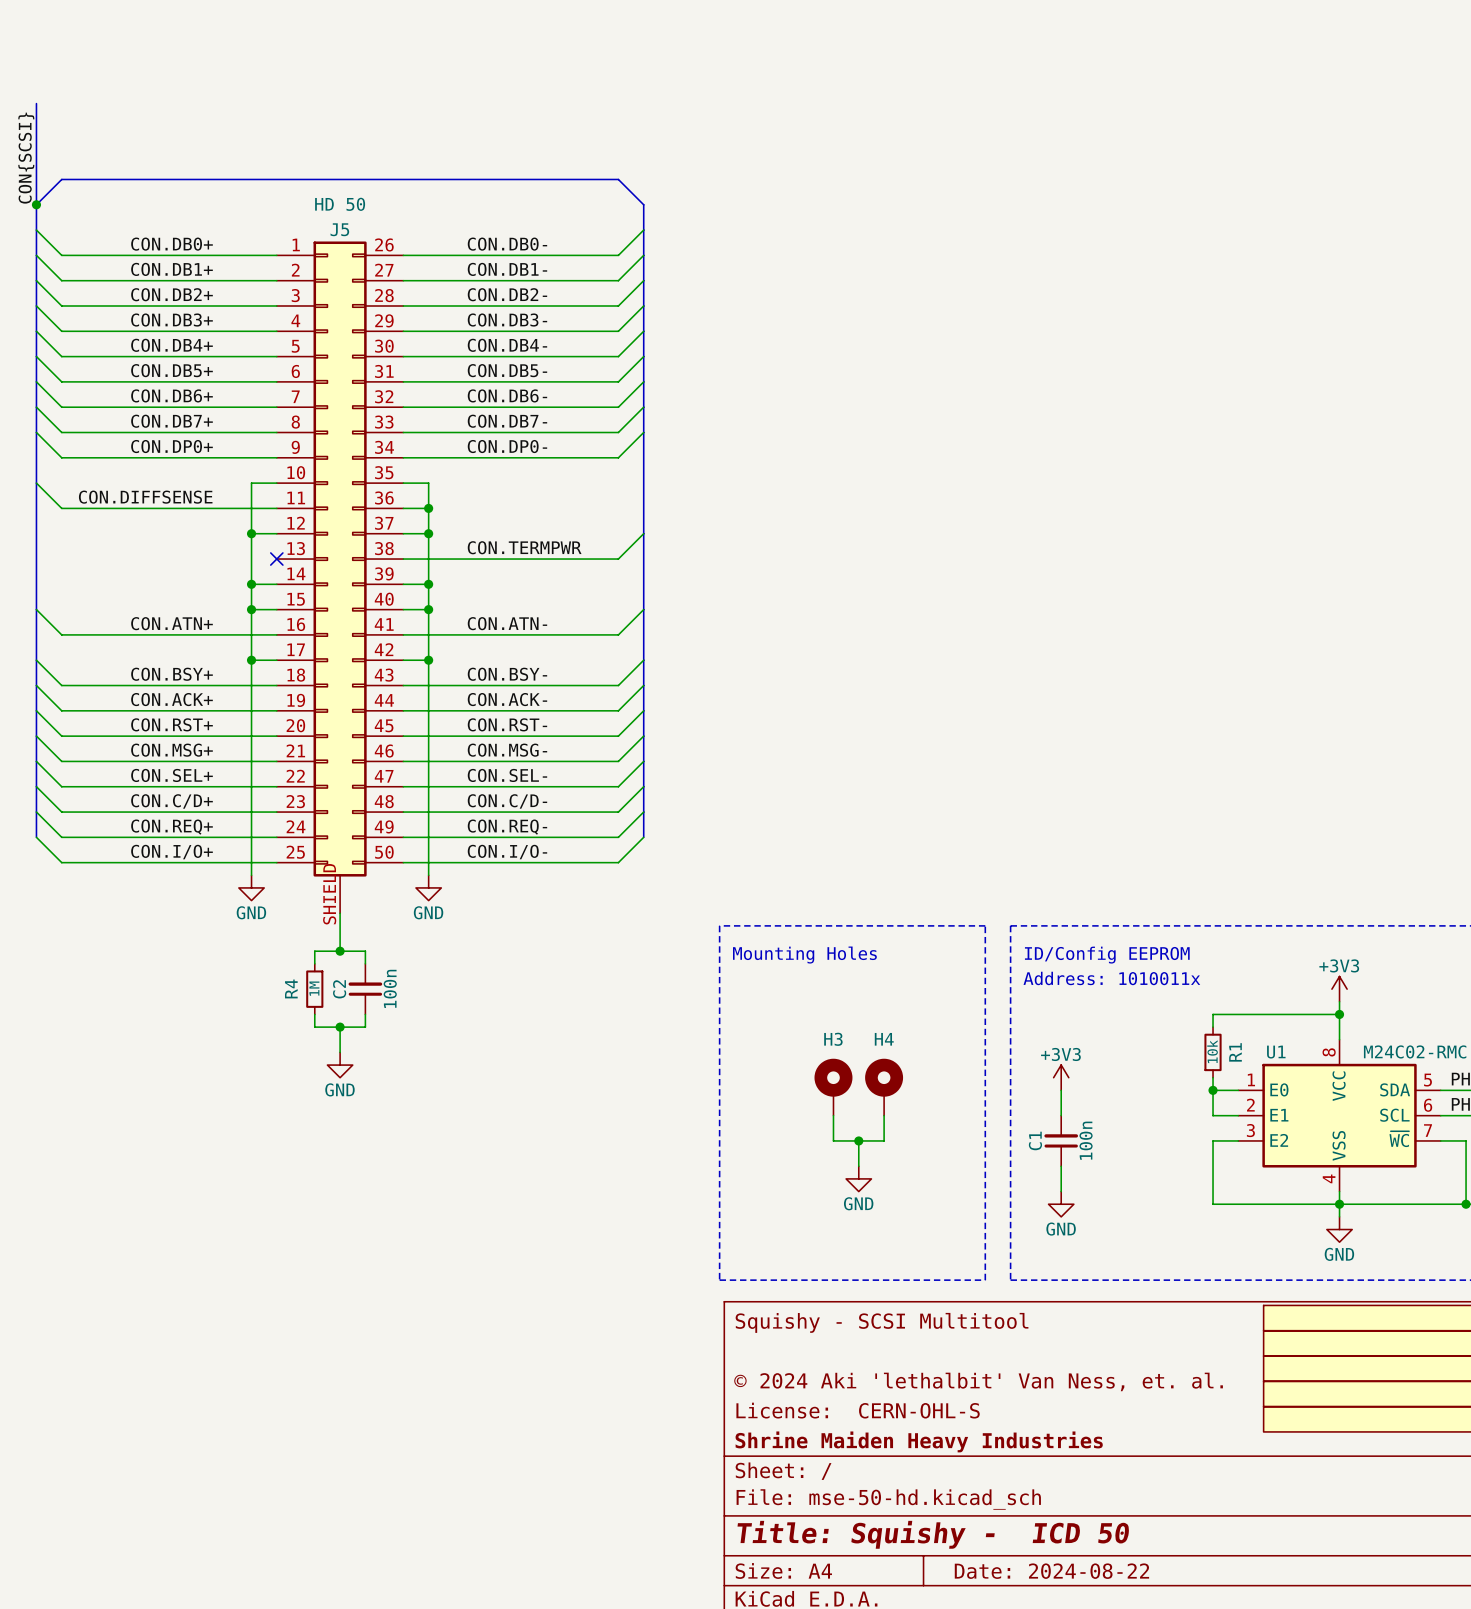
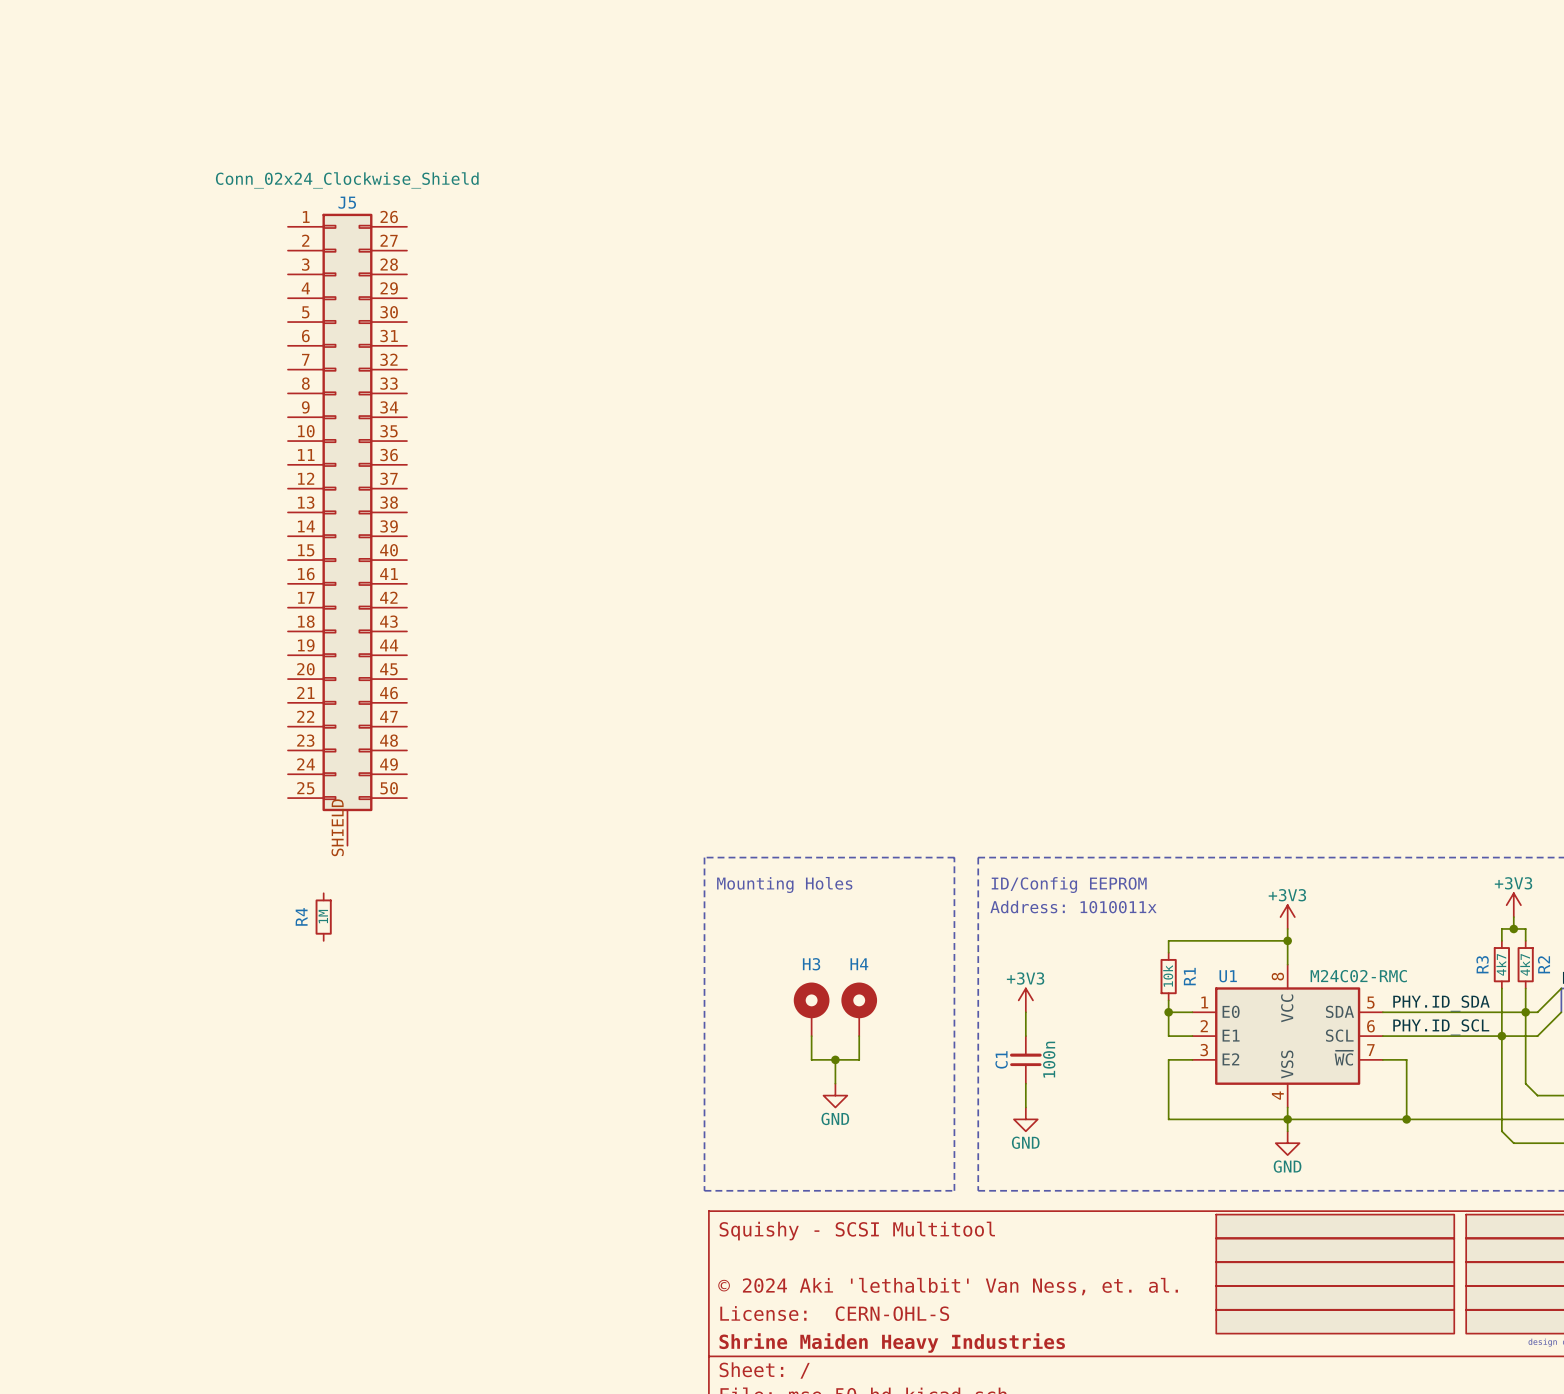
bus: (36, 103) (36, 837) -> none
label: CON{SCSI} (26, 158) -> none
bus: (36, 204) (61, 179) (618, 179) (643, 204) (643, 837) -> none
junction: (36, 204) -> none
J5 value: HD 50 (340, 204) -> Conn_02x24_Clockwise_Shield (347, 180)
wire: (36, 230) (61, 255) (276, 255) -> none
wire: (643, 230) (618, 255) (403, 255) -> none
label: CON.DB0+ (172, 244) -> none
label: CON.DB0- (507, 244) -> none
wire: (36, 255) (61, 280) (276, 280) -> none
wire: (643, 255) (618, 280) (403, 280) -> none
label: CON.DB1+ (172, 269) -> none
label: CON.DB1- (507, 269) -> none
wire: (36, 280) (61, 305) (276, 305) -> none
wire: (643, 280) (618, 305) (403, 305) -> none
label: CON.DB2+ (172, 294) -> none
label: CON.DB2- (507, 294) -> none
wire: (36, 305) (61, 331) (276, 331) -> none
wire: (643, 305) (618, 331) (403, 331) -> none
label: CON.DB3+ (172, 320) -> none
label: CON.DB3- (507, 320) -> none
wire: (36, 331) (61, 356) (276, 356) -> none
wire: (643, 331) (618, 356) (403, 356) -> none
label: CON.DB4+ (172, 345) -> none
label: CON.DB4- (507, 345) -> none
wire: (36, 356) (61, 381) (276, 381) -> none
wire: (643, 356) (618, 381) (403, 381) -> none
label: CON.DB5+ (172, 370) -> none
label: CON.DB5- (507, 370) -> none
wire: (36, 381) (61, 407) (276, 407) -> none
wire: (643, 381) (618, 407) (403, 407) -> none
label: CON.DB6+ (172, 395) -> none
label: CON.DB6- (507, 395) -> none
wire: (36, 407) (61, 432) (276, 432) -> none
wire: (643, 407) (618, 432) (403, 432) -> none
label: CON.DB7+ (172, 421) -> none
label: CON.DB7- (507, 421) -> none
wire: (36, 432) (61, 457) (276, 457) -> none
wire: (643, 432) (618, 457) (403, 457) -> none
label: CON.DP0+ (172, 446) -> none
label: CON.DP0- (507, 446) -> none
wire: (36, 483) (61, 508) (276, 508) -> none
wire: (276, 483) (251, 483) (251, 875) -> none
wire: (403, 483) (428, 483) (428, 875) -> none
label: CON.DIFFSENSE (145, 497) -> none
wire: (403, 508) (428, 508) -> none
junction: (428, 508) -> none
wire: (251, 533) (276, 533) -> none
junction: (251, 533) -> none
wire: (403, 533) (428, 533) -> none
junction: (428, 533) -> none
wire: (643, 533) (618, 559) (403, 559) -> none
label: CON.TERMPWR (524, 547) -> none
no-connect mark: (276, 559) -> none
wire: (251, 584) (276, 584) -> none
junction: (251, 584) -> none
wire: (403, 584) (428, 584) -> none
junction: (428, 584) -> none
wire: (36, 609) (61, 634) (276, 634) -> none
wire: (251, 609) (276, 609) -> none
junction: (251, 609) -> none
wire: (403, 609) (428, 609) -> none
junction: (428, 609) -> none
wire: (643, 609) (618, 634) (403, 634) -> none
label: CON.ATN+ (172, 623) -> none
label: CON.ATN- (507, 623) -> none
wire: (36, 660) (61, 685) (276, 685) -> none
wire: (251, 660) (276, 660) -> none
junction: (251, 660) -> none
wire: (403, 660) (428, 660) -> none
junction: (428, 660) -> none
wire: (643, 660) (618, 685) (403, 685) -> none
label: CON.BSY+ (172, 674) -> none
label: CON.BSY- (507, 674) -> none
wire: (36, 685) (61, 710) (276, 710) -> none
wire: (643, 685) (618, 710) (403, 710) -> none
label: CON.ACK+ (172, 699) -> none
label: CON.ACK- (507, 699) -> none
wire: (36, 710) (61, 736) (276, 736) -> none
wire: (643, 710) (618, 736) (403, 736) -> none
label: CON.RST+ (172, 724) -> none
label: CON.RST- (507, 724) -> none
wire: (36, 736) (61, 761) (276, 761) -> none
wire: (643, 736) (618, 761) (403, 761) -> none
label: CON.MSG+ (172, 750) -> none
label: CON.MSG- (507, 750) -> none
wire: (36, 761) (61, 786) (276, 786) -> none
wire: (643, 761) (618, 786) (403, 786) -> none
label: CON.SEL+ (172, 775) -> none
label: CON.SEL- (507, 775) -> none
wire: (36, 786) (61, 812) (276, 812) -> none
wire: (643, 786) (618, 812) (403, 812) -> none
label: CON.C/D+ (172, 801) -> none
label: CON.C/D- (507, 801) -> none
wire: (36, 812) (61, 837) (276, 837) -> none
wire: (643, 812) (618, 837) (403, 837) -> none
label: CON.REQ+ (172, 827) -> none
label: CON.REQ- (507, 827) -> none
wire: (36, 837) (61, 862) (276, 862) -> none
wire: (643, 837) (618, 862) (403, 862) -> none
label: CON.I/O+ (172, 852) -> none
label: CON.I/O- (507, 852) -> none
power symbol: GND (251, 887) -> none
power symbol: GND (428, 887) -> none
wire: (340, 913) (340, 951) -> none
junction: (340, 951) -> none
wire: (314, 963) (314, 951) (365, 951) (365, 963) -> none
C2: 100n (365, 989) -> none
wire: (314, 1014) (314, 1027) (365, 1027) (365, 1014) -> none
wire: (340, 1027) (340, 1052) -> none
junction: (340, 1027) -> none
power symbol: GND (340, 1065) -> none

